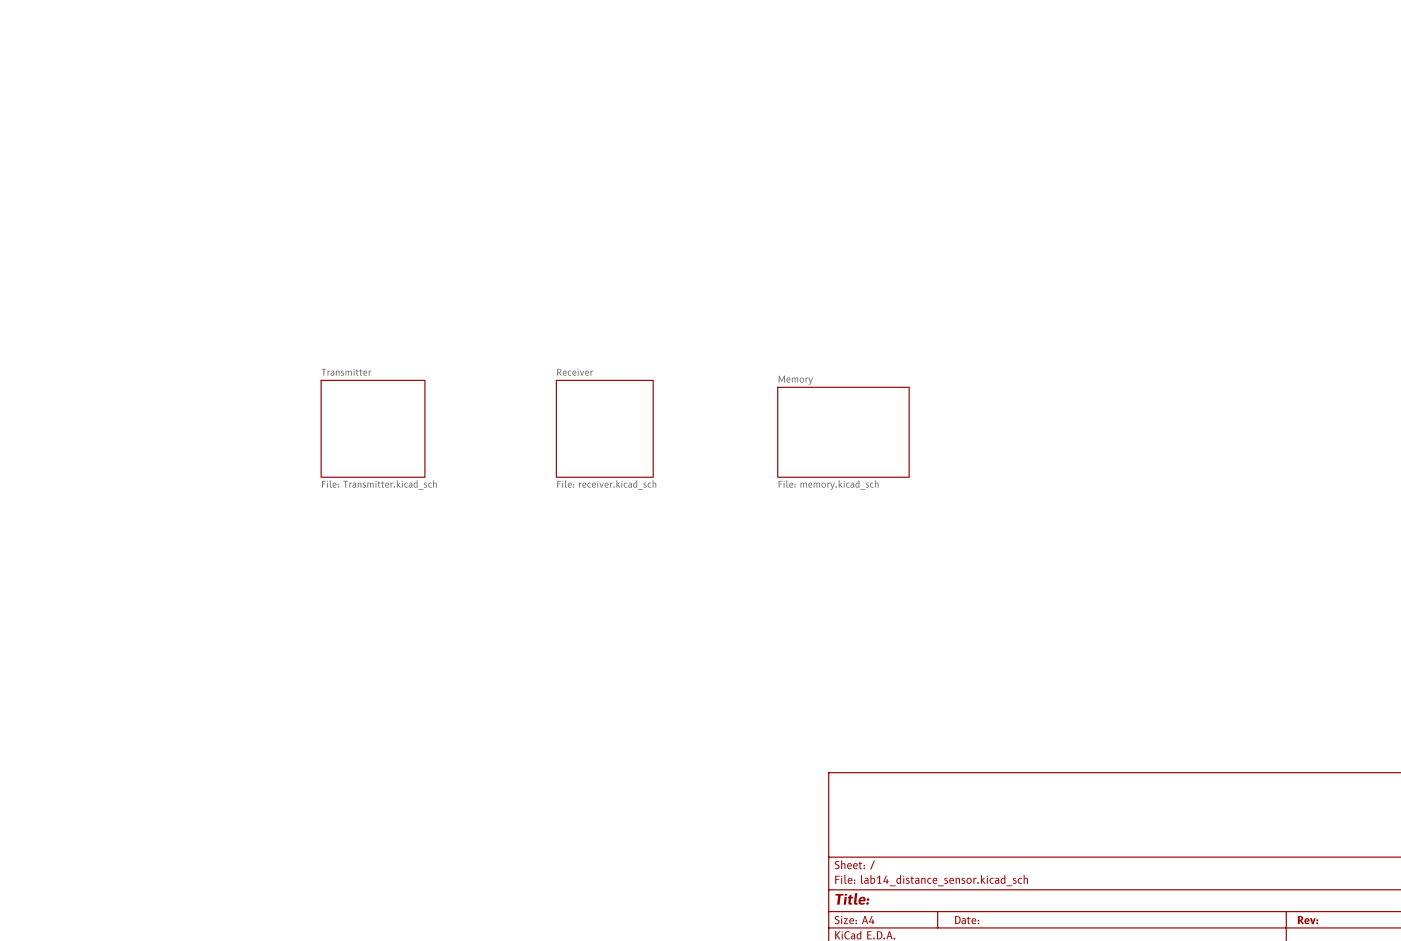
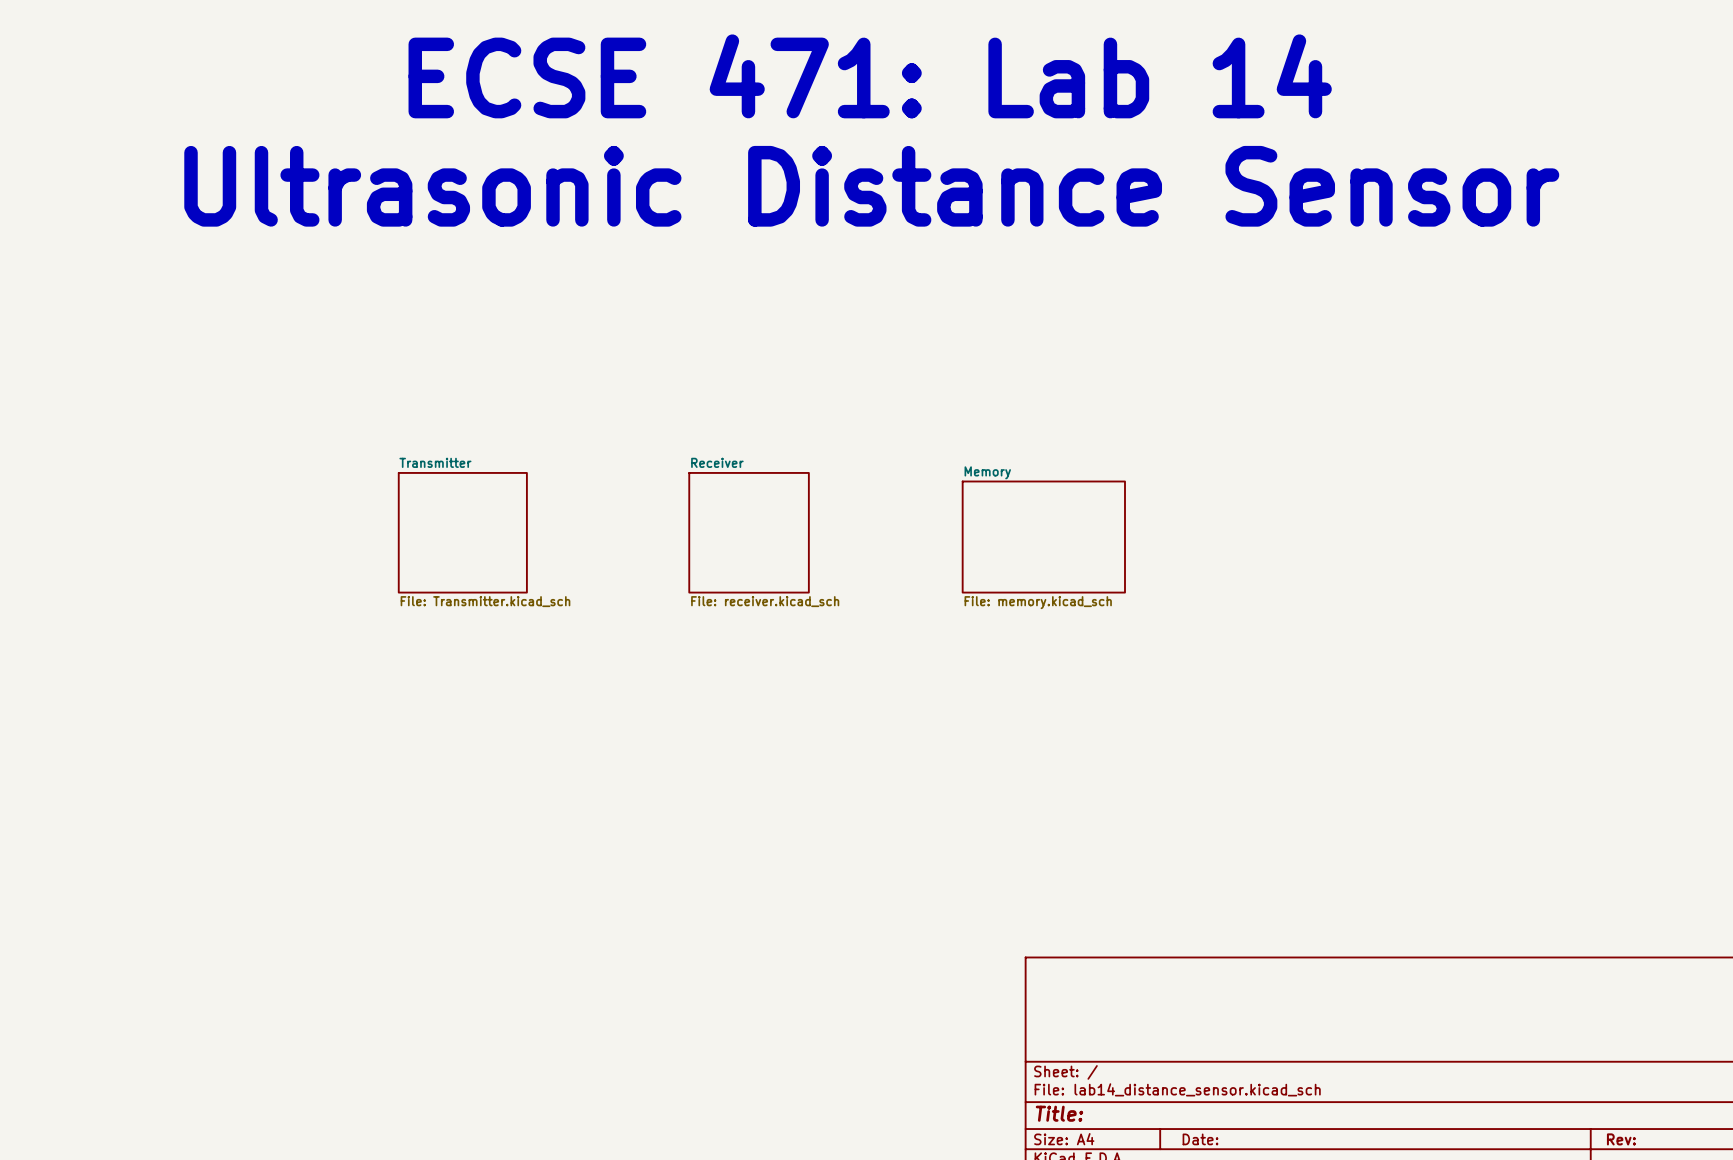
text: none -> ECSE 471: Lab 14 (870, 76)
text: none -> Ultrasonic Distance Sensor (871, 186)

